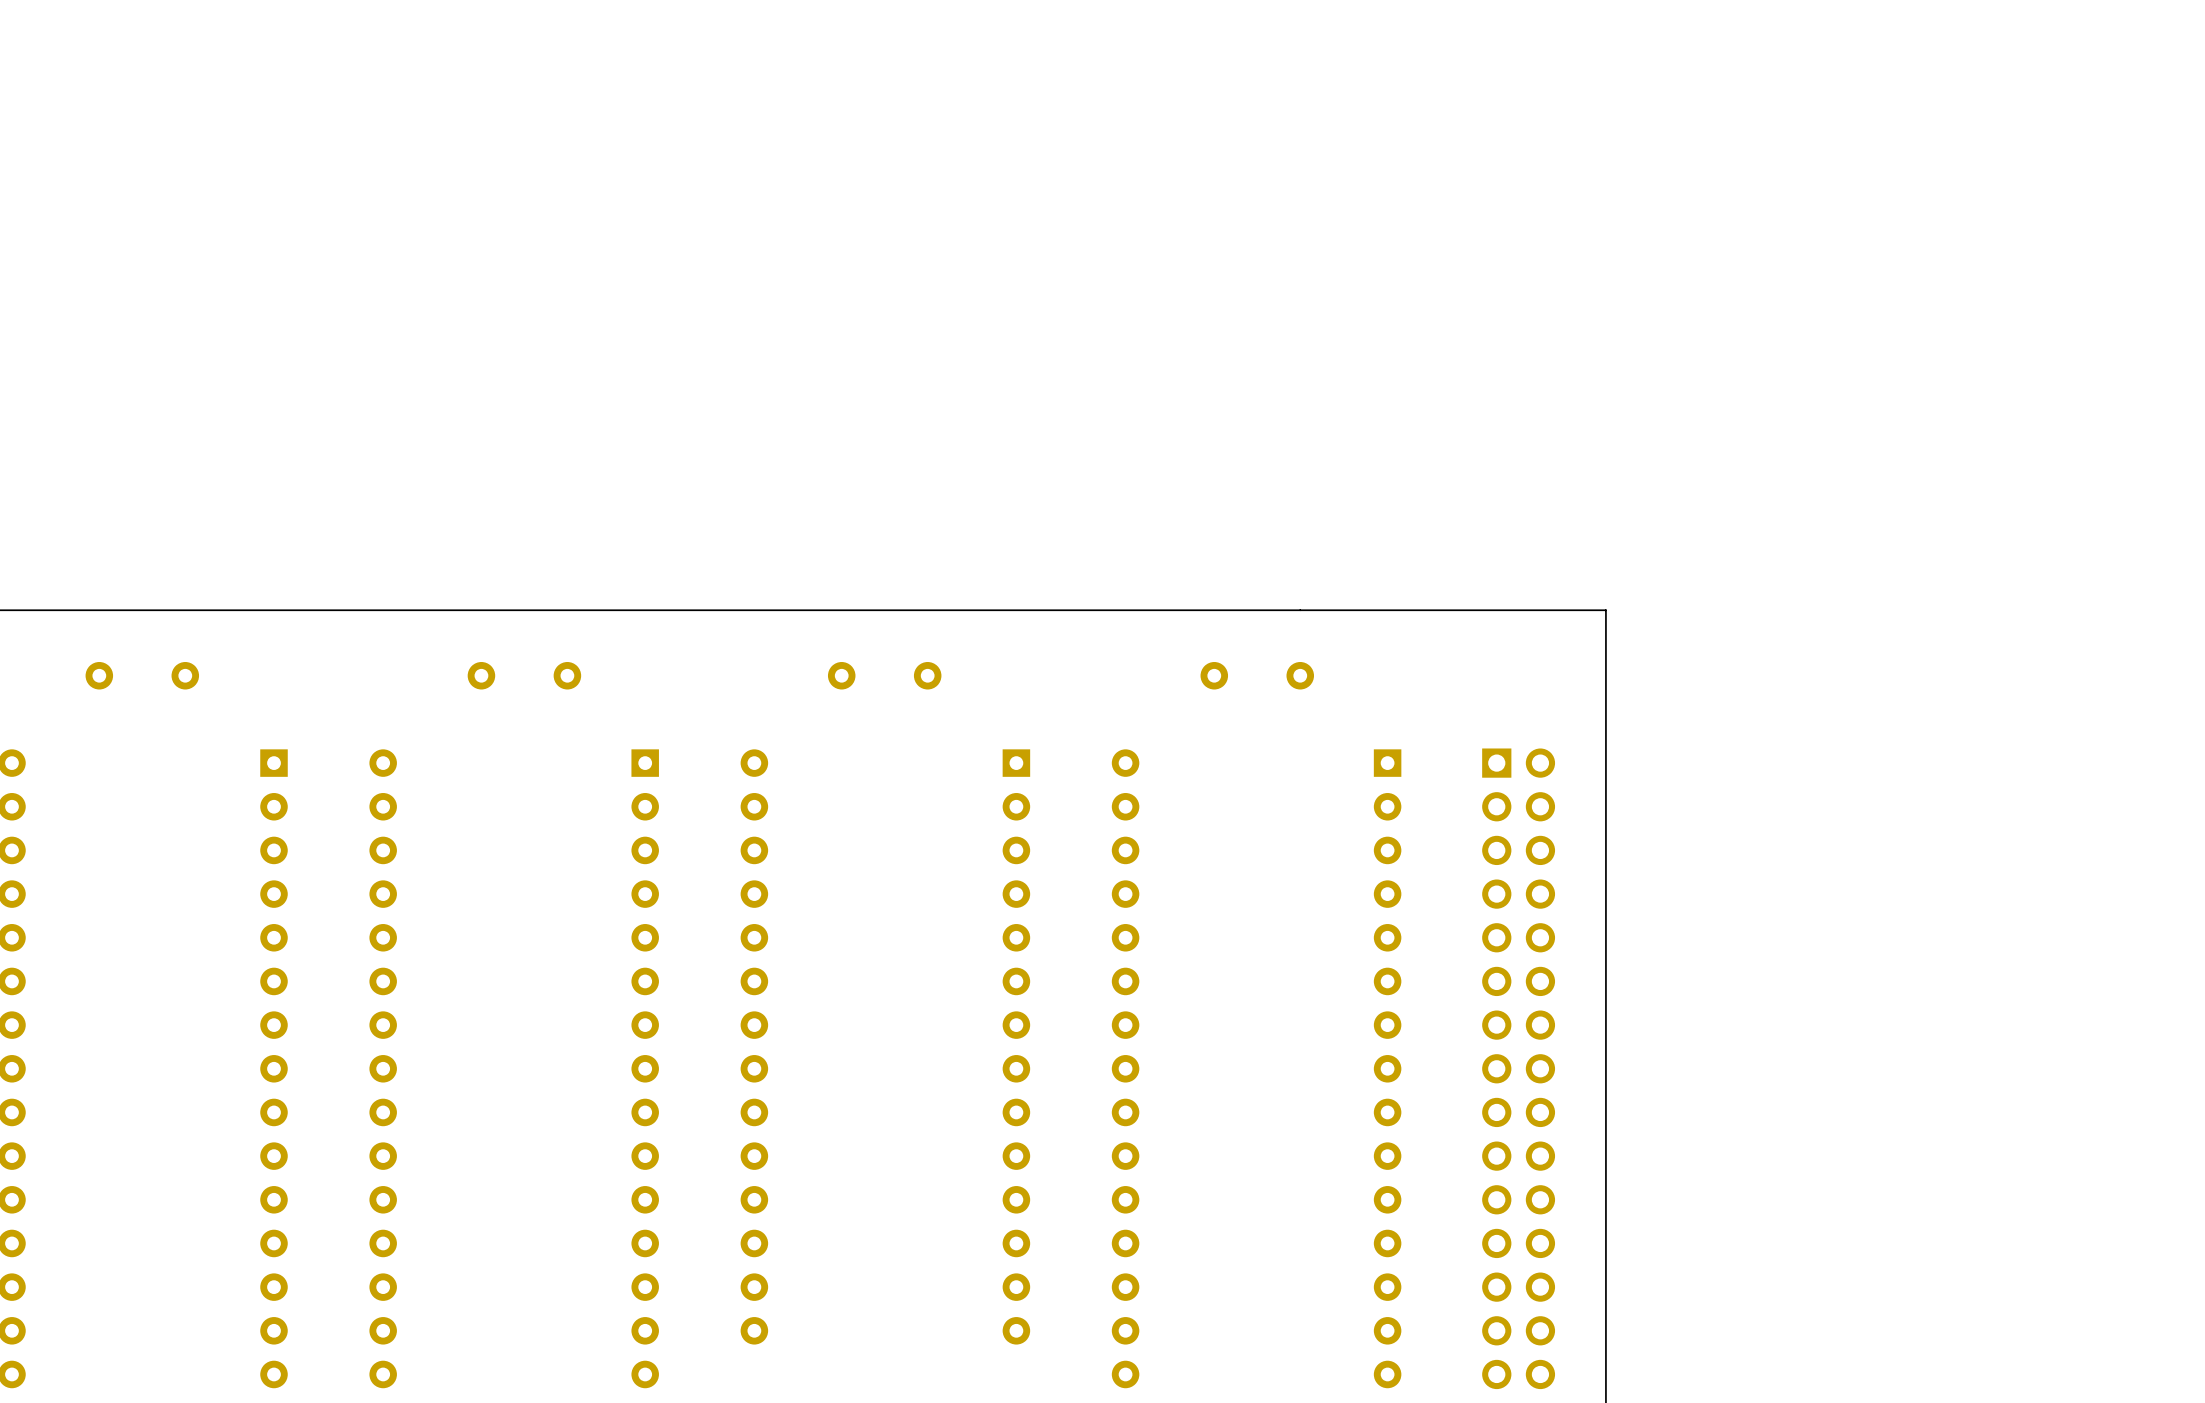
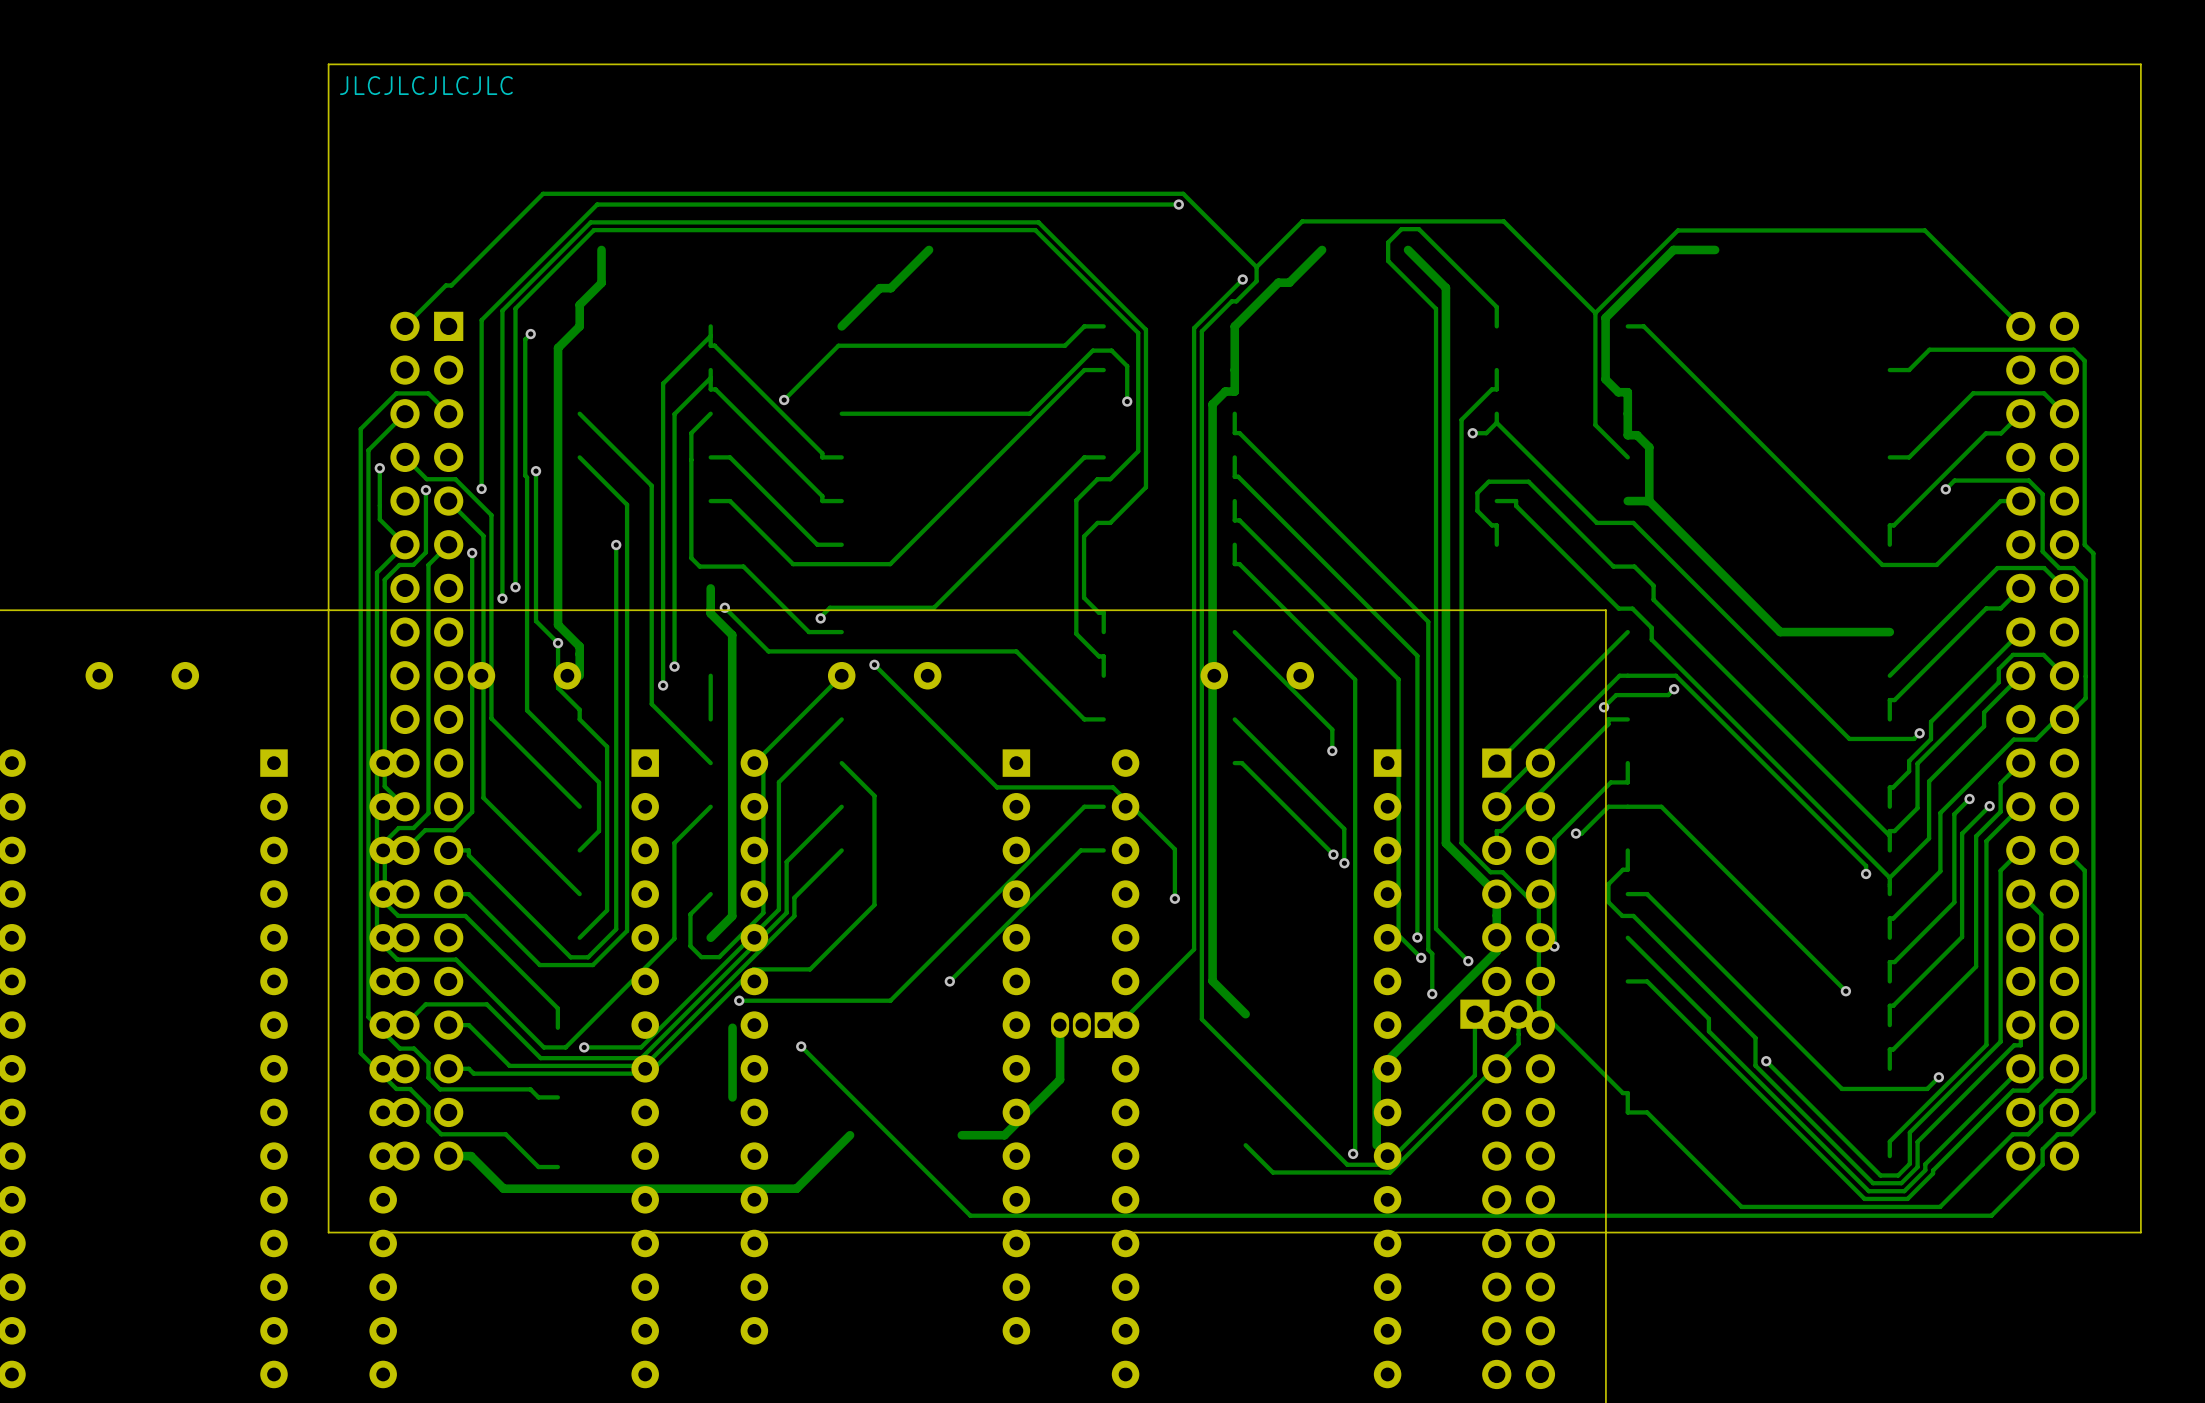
board edge: none -> (2140, 64) (2140, 1232) (328, 1232) (328, 64) (2140, 64)
text: none -> JLCJLCJLCJLC (426, 85)
track: none -> (1178, 204) (597, 204) (481, 320) (481, 488)
via: none -> (1178, 204)
track: none -> (601, 249) (601, 283) (579, 304) (579, 326) (558, 348) (558, 624) (579, 646) (579, 675)
track: none -> (929, 249) (890, 288) (879, 288) (841, 326)
track: none -> (1322, 249) (1289, 282) (1278, 282) (1234, 326) (1234, 391) (1225, 391) (1212, 404) (1212, 981) (1245, 1014)
track: none -> (1408, 249) (1445, 287) (1445, 843) (1496, 894) (1496, 951) (1376, 1071) (1376, 1145)
track: none -> (1715, 249) (1673, 249) (1605, 317) (1605, 379) (1618, 392) (1627, 392) (1627, 435) (1637, 435) (1649, 447) (1649, 501)
track: none -> (1256, 267) (1256, 281) (1236, 301) (1231, 301) (1201, 331) (1201, 1019) (1347, 1164) (1385, 1164) (1474, 1075) (1474, 1014)
track: none -> (1256, 267) (1183, 193) (543, 193) (451, 285) (445, 285) (405, 326)
track: none -> (1256, 267) (1302, 221) (1503, 221) (1595, 313)
track: none -> (1242, 279) (1194, 328) (1194, 949) (1118, 1025) (1103, 1025)
via: none -> (1242, 279)
track: none -> (1595, 313) (1595, 425) (1627, 457)
track: none -> (1595, 313) (1677, 230) (1924, 230) (2020, 326)
track: none -> (710, 326) (710, 345) (714, 345) (822, 453) (822, 457) (841, 457)
track: none -> (1103, 326) (1084, 326) (1065, 345) (838, 345) (784, 400)
track: none -> (1496, 326) (1496, 307) (1418, 229) (1401, 229) (1388, 242) (1388, 261) (1436, 308) (1436, 928) (1468, 961)
track: none -> (1627, 326) (1643, 326) (1882, 564) (1936, 564) (2000, 501) (2020, 501)
track: none -> (530, 334) (525, 339) (527, 710) (599, 782) (599, 831) (579, 850)
via: none -> (530, 334)
track: none -> (710, 336) (663, 383) (663, 685)
track: none -> (710, 370) (710, 389) (715, 389) (822, 496) (822, 501) (841, 501)
track: none -> (1103, 370) (1084, 370) (890, 564) (793, 564) (730, 501) (710, 501)
track: none -> (1496, 370) (1496, 389) (1491, 389) (1461, 419) (1461, 843) (1490, 872) (1502, 872) (1538, 908) (1538, 1009) (1622, 1093) (1627, 1093) (1627, 1112) (1647, 1112) (1741, 1206) (1940, 1206) (2012, 1134) (2028, 1134) (2041, 1121) (2041, 1106) (2056, 1090) (2071, 1090) (2084, 1077) (2084, 870) (2064, 850)
track: none -> (1889, 370) (1909, 370) (1929, 349) (2073, 349) (2084, 360) (2084, 544) (2093, 553) (2093, 1112) (2071, 1134) (2057, 1134) (2042, 1149) (2042, 1164) (1991, 1215) (970, 1215) (801, 1046)
track: none -> (710, 377) (674, 414) (674, 666)
via: none -> (784, 400)
track: none -> (1127, 401) (1127, 366) (1111, 350) (1092, 350) (1029, 413) (841, 413)
via: none -> (1127, 401)
track: none -> (405, 413) (368, 450) (368, 1017) (399, 1048) (414, 1048) (428, 1063) (428, 1077) (440, 1089) (530, 1089) (538, 1097) (557, 1097)
track: none -> (448, 413) (428, 393) (396, 393) (360, 429) (360, 1053) (396, 1088) (410, 1088) (428, 1107) (428, 1121) (441, 1134) (505, 1134) (538, 1167) (557, 1167)
track: none -> (579, 413) (651, 485) (651, 704) (710, 763)
track: none -> (710, 413) (691, 433) (691, 558) (699, 566) (743, 566) (808, 632) (841, 632)
track: none -> (1234, 413) (1234, 433) (1239, 433) (1428, 621) (1428, 949) (1432, 953) (1432, 993)
track: none -> (1496, 413) (1496, 422)
track: none -> (2020, 413) (2001, 433) (1985, 433) (1893, 525) (1889, 525) (1889, 544)
track: none -> (2064, 413) (2044, 393) (1973, 393) (1909, 457) (1889, 457)
track: none -> (1496, 422) (1486, 433) (1472, 433)
track: none -> (1496, 422) (1596, 522) (1633, 522) (1849, 738) (1914, 738) (1919, 733)
via: none -> (1472, 433)
track: none -> (405, 457) (426, 479) (455, 479) (491, 515) (491, 718) (579, 806)
track: none -> (579, 457) (627, 504) (627, 930) (592, 965) (539, 965) (468, 894) (448, 894)
track: none -> (710, 457) (730, 457) (817, 544) (841, 544)
track: none -> (1103, 457) (1084, 457) (934, 607) (829, 607) (820, 618)
track: none -> (1234, 457) (1234, 476) (1238, 476) (1417, 655) (1417, 937)
track: none -> (379, 468) (379, 519) (405, 544) (376, 572) (376, 939) (397, 959) (456, 959) (543, 1047) (565, 1047) (674, 938) (674, 843) (710, 806)
via: none -> (379, 468)
track: none -> (536, 471) (536, 621) (558, 643) (558, 688) (579, 709) (579, 719) (607, 746) (607, 910) (579, 937)
via: none -> (536, 471)
via: none -> (481, 488)
track: none -> (1945, 489) (1954, 480) (2028, 480) (2042, 494) (2042, 551) (2059, 568) (2073, 568) (2085, 580) (2085, 698) (2064, 719) (2064, 711) (2036, 739) (2013, 739) (1940, 812) (1940, 871) (1893, 918) (1889, 918) (1889, 937)
via: none -> (1945, 489)
track: none -> (425, 490) (425, 552) (413, 564) (399, 564) (384, 579) (384, 786) (405, 806)
via: none -> (425, 490)
track: none -> (448, 501) (483, 535) (483, 797) (579, 894)
track: none -> (1234, 501) (1234, 520) (1239, 520) (1398, 679) (1398, 935) (1421, 957)
track: none -> (1496, 501) (1516, 501) (1516, 505) (1618, 608) (1632, 608) (1651, 627) (1651, 639) (1889, 877)
track: none -> (1649, 501) (1780, 632) (1889, 632)
track: none -> (1649, 501) (1627, 501)
track: none -> (448, 544) (428, 564) (428, 813) (413, 828) (398, 828) (384, 842) (384, 902) (398, 915) (465, 915) (557, 1008) (557, 1027)
track: none -> (1234, 544) (1234, 564) (1239, 564) (1355, 679) (1355, 1151) (1353, 1153)
track: none -> (1496, 544) (1496, 525) (1491, 525) (1477, 510) (1477, 493) (1488, 481) (1528, 481) (1613, 566) (1634, 566) (1653, 585) (1653, 599) (1889, 835)
track: none -> (616, 545) (616, 929) (588, 957) (570, 957) (468, 855) (468, 850) (448, 850)
via: none -> (616, 545)
track: none -> (472, 553) (472, 811) (453, 830) (425, 830) (405, 850)
via: none -> (472, 553)
track: none -> (515, 587) (515, 308) (593, 230) (1035, 230) (1138, 332) (1138, 451) (1110, 479) (1097, 479) (1076, 500) (1076, 633) (1098, 656) (1103, 656) (1103, 675)
via: none -> (515, 587)
track: none -> (710, 588) (710, 613) (732, 635) (732, 916) (710, 937)
track: none -> (2020, 588) (2000, 608) (1986, 608) (1894, 700) (1889, 700) (1889, 719)
track: none -> (2064, 588) (2044, 568) (1997, 568) (1889, 675)
track: none -> (502, 598) (502, 310) (590, 222) (1038, 222) (1145, 329) (1145, 487) (1110, 522) (1097, 522) (1084, 536) (1084, 597) (1098, 612) (1103, 612) (1103, 632)
via: none -> (502, 598)
track: none -> (724, 607) (768, 651) (1016, 651) (1084, 719) (1103, 719)
via: none -> (724, 607)
via: none -> (820, 618)
track: none -> (1234, 632) (1332, 729) (1332, 750)
track: none -> (1627, 632) (1496, 763)
track: none -> (2020, 632) (1931, 721) (1931, 739) (1909, 761) (1909, 771) (1893, 787) (1889, 787) (1889, 806)
via: none -> (558, 643)
track: none -> (874, 664) (997, 787) (1113, 787) (1174, 849) (1174, 898)
via: none -> (874, 664)
via: none -> (674, 666)
track: none -> (710, 675) (710, 719)
track: none -> (841, 675) (763, 754) (763, 912) (719, 957) (701, 957) (690, 946) (690, 914) (710, 894)
track: none -> (2020, 675) (1984, 712) (1984, 726) (1929, 781) (1929, 838) (1889, 877)
track: none -> (2064, 675) (2043, 654) (2013, 654) (1998, 669) (1998, 682) (1917, 763) (1917, 808) (1894, 831) (1889, 831) (1889, 850)
via: none -> (663, 685)
track: none -> (1674, 689) (1668, 695) (1616, 695) (1604, 707)
via: none -> (1674, 689)
via: none -> (1604, 707)
track: none -> (841, 719) (778, 782) (778, 909) (641, 1047) (584, 1047)
track: none -> (1234, 719) (1344, 828) (1344, 863)
track: none -> (1627, 719) (1608, 719) (1608, 724) (1501, 831) (1496, 831) (1496, 850)
via: none -> (1919, 733)
part: none -> (426, 741)
part: none -> (2042, 741)
via: none -> (1332, 750)
track: none -> (841, 763) (874, 795) (874, 905) (810, 969) (753, 969) (649, 1073) (473, 1073) (468, 1068) (448, 1068)
track: none -> (1234, 763) (1241, 763) (1333, 854)
track: none -> (1627, 763) (1627, 782) (1610, 782) (1554, 838) (1554, 946)
track: none -> (2020, 763) (2000, 783) (2000, 811) (1976, 836) (1976, 966) (1893, 1049) (1889, 1049) (1889, 1068)
track: none -> (1969, 798) (1954, 814) (1954, 902) (1894, 962) (1889, 962) (1889, 981)
via: none -> (1969, 798)
track: none -> (841, 806) (786, 861) (786, 912) (641, 1058) (540, 1058) (486, 1004) (425, 1004) (405, 1025)
track: none -> (1103, 806) (1084, 806) (890, 1000) (739, 1000)
track: none -> (1496, 806) (1496, 798) (1619, 675) (1675, 675) (1866, 865) (1866, 873)
track: none -> (1989, 806) (1962, 833) (1962, 936) (1893, 1005) (1889, 1005) (1889, 1025)
via: none -> (1989, 806)
track: none -> (2020, 806) (1986, 841) (1986, 1044) (1889, 1141) (1889, 1156)
track: none -> (1576, 833) (1581, 833) (1608, 806) (1661, 806) (1845, 991)
via: none -> (1576, 833)
track: none -> (841, 850) (794, 897) (794, 916) (644, 1065) (509, 1065) (468, 1025) (448, 1025)
track: none -> (1103, 850) (1080, 850) (949, 981)
track: none -> (1627, 850) (1627, 869) (1622, 869) (1608, 884) (1608, 902) (1622, 915) (1633, 915) (1755, 1037) (1755, 1065) (1873, 1183) (1901, 1183) (1917, 1167) (1917, 1141) (2014, 1045) (2020, 1045) (2020, 1025)
track: none -> (2020, 850) (2000, 870) (2000, 1041) (1909, 1132) (1909, 1163) (1898, 1175) (1880, 1175) (1766, 1061)
via: none -> (1333, 854)
via: none -> (1344, 863)
via: none -> (1866, 873)
track: none -> (1889, 877) (1889, 894)
track: none -> (1627, 894) (1647, 894) (1841, 1088) (1927, 1088) (1938, 1077)
track: none -> (2020, 894) (2041, 914) (2041, 1077) (2028, 1090) (2012, 1090) (1933, 1170) (1933, 1173) (1907, 1198) (1864, 1198) (1647, 981) (1627, 981)
via: none -> (1174, 898)
via: none -> (1417, 937)
track: none -> (1627, 937) (1708, 1018) (1708, 1031) (1868, 1191) (1904, 1191) (1925, 1170) (1925, 1164) (2020, 1068)
via: none -> (1554, 946)
via: none -> (1421, 957)
via: none -> (1468, 961)
via: none -> (949, 981)
via: none -> (1845, 991)
via: none -> (1432, 993)
via: none -> (739, 1000)
part: none -> (1496, 1014)
track: none -> (1518, 1014) (1518, 1043) (1390, 1172) (1272, 1172) (1245, 1145)
track: none -> (1060, 1025) (1060, 1079) (1004, 1135) (961, 1135)
part: none -> (1081, 1025)
track: none -> (732, 1027) (732, 1097)
via: none -> (801, 1046)
via: none -> (584, 1047)
via: none -> (1766, 1061)
via: none -> (1938, 1077)
track: none -> (850, 1135) (796, 1188) (503, 1188) (471, 1156) (448, 1156)
via: none -> (1353, 1153)

